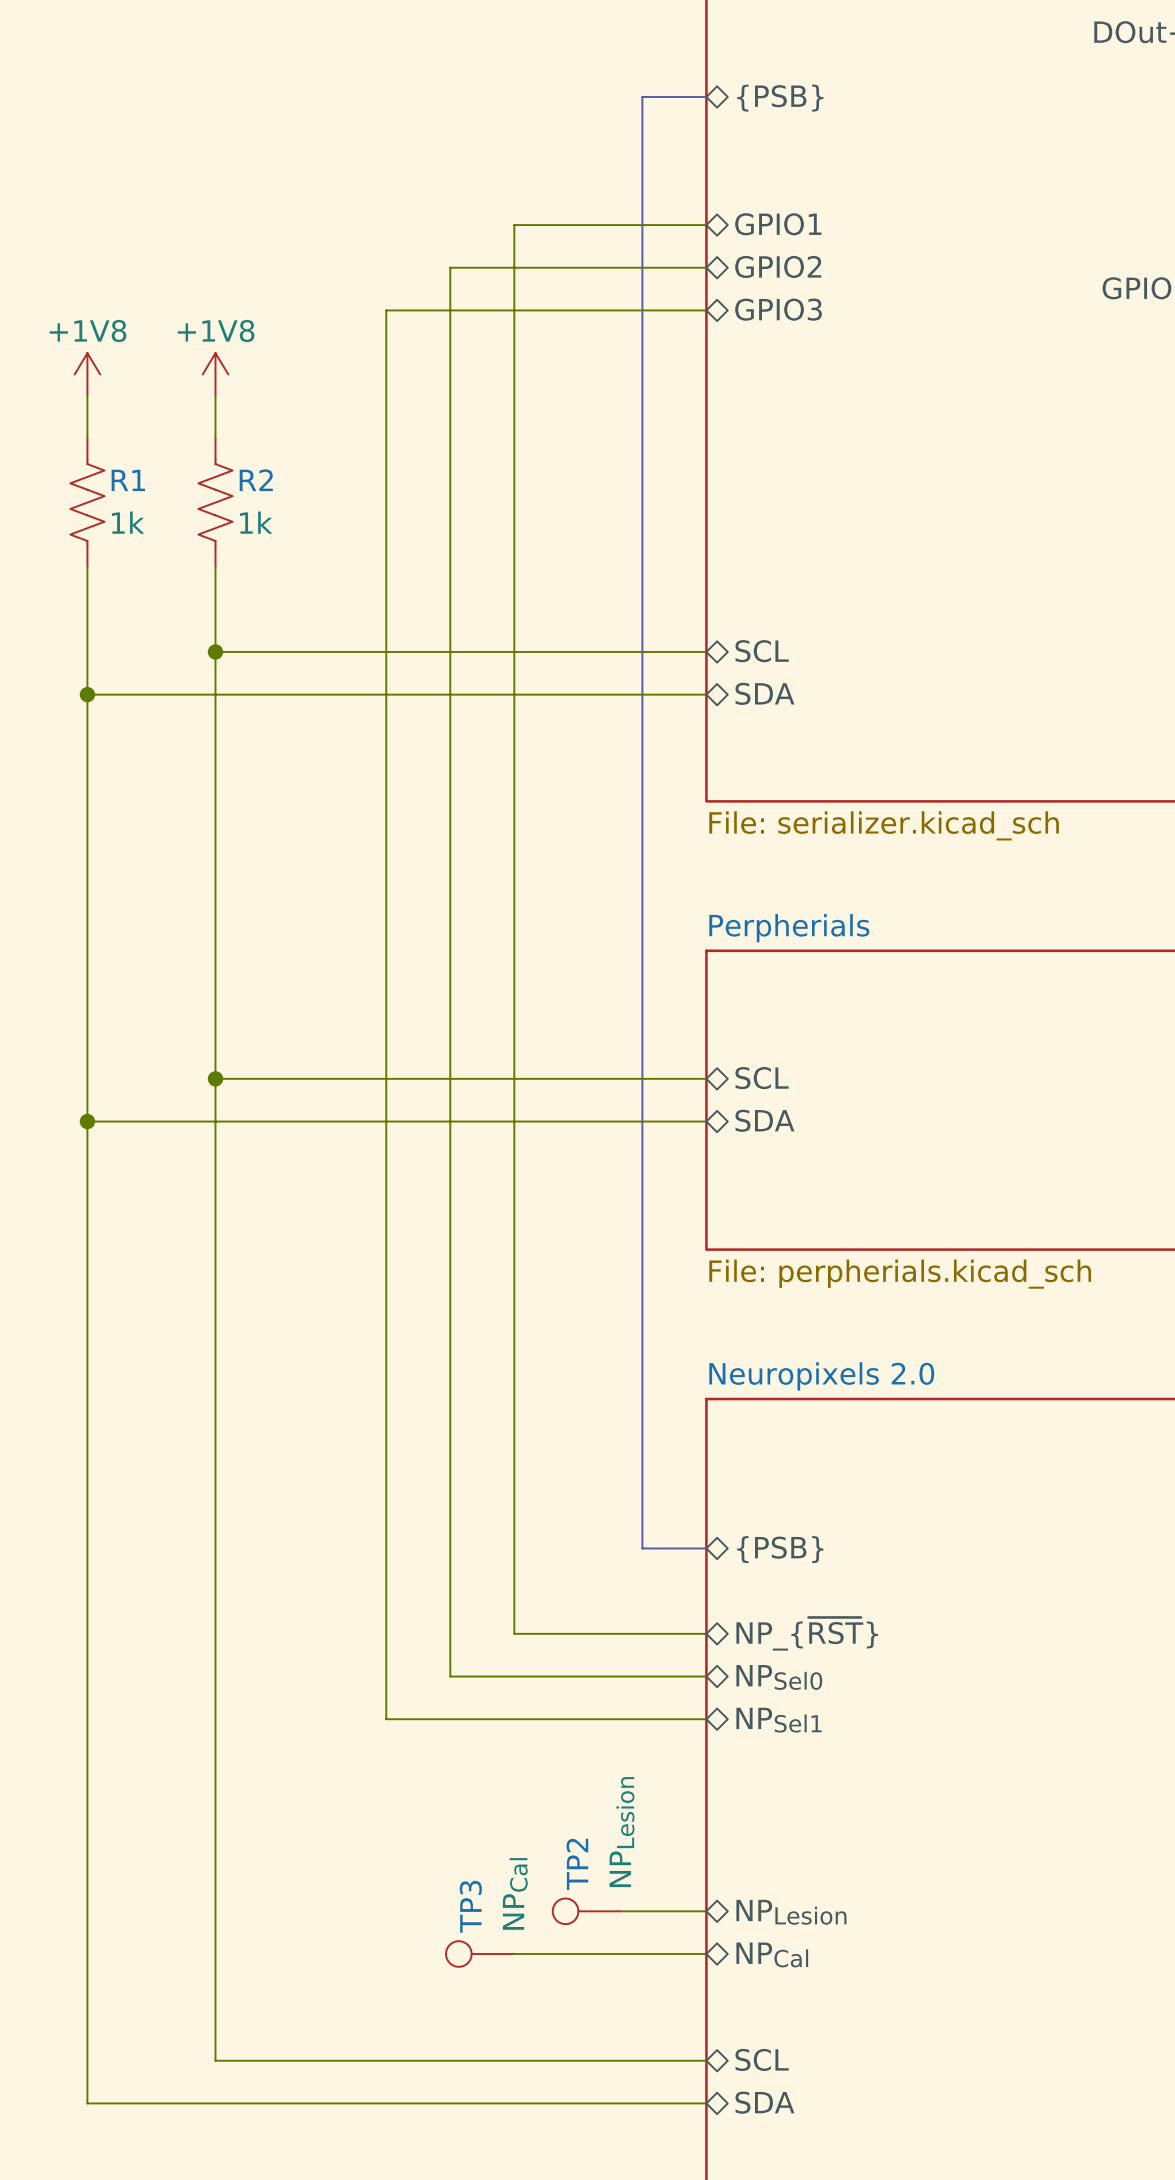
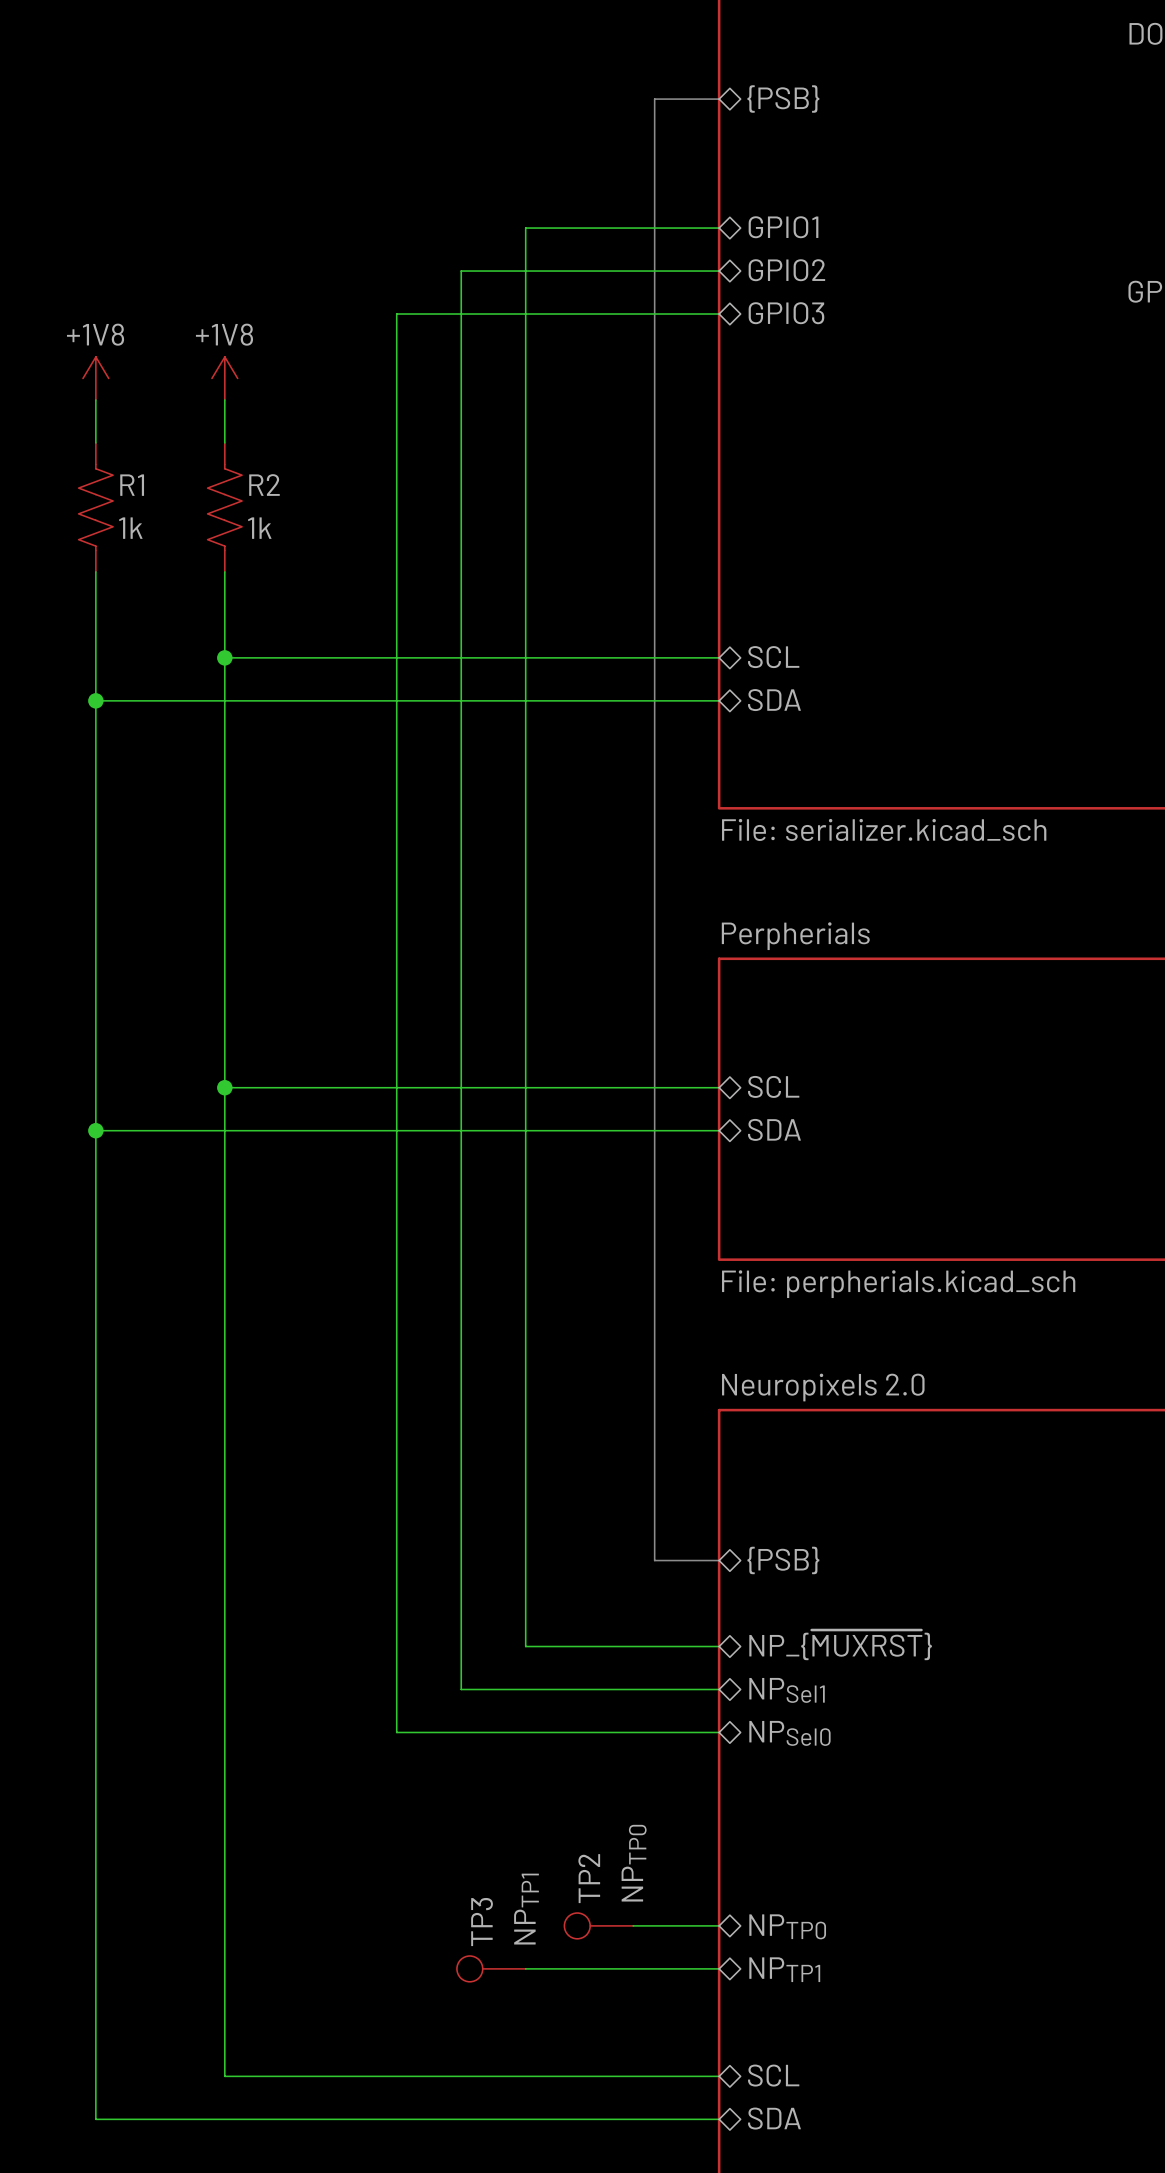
sheet pin: NP_{~{RST}} (807, 1634) -> NP_{~{MUXRST}} (840, 1645)
sheet pin: NPSel0 (779, 1677) -> NPSel1 (787, 1690)
sheet pin: NPSel1 (779, 1720) -> NPSel0 (789, 1733)
TP2 value: NPLesion (622, 1832) -> NPTP0 (634, 1863)
TP3 value: NPCal (515, 1893) -> NPTP1 (526, 1909)
sheet pin: NPLesion (791, 1912) -> NPTP0 (787, 1926)
sheet pin: NPCal (772, 1954) -> NPTP1 (784, 1969)

